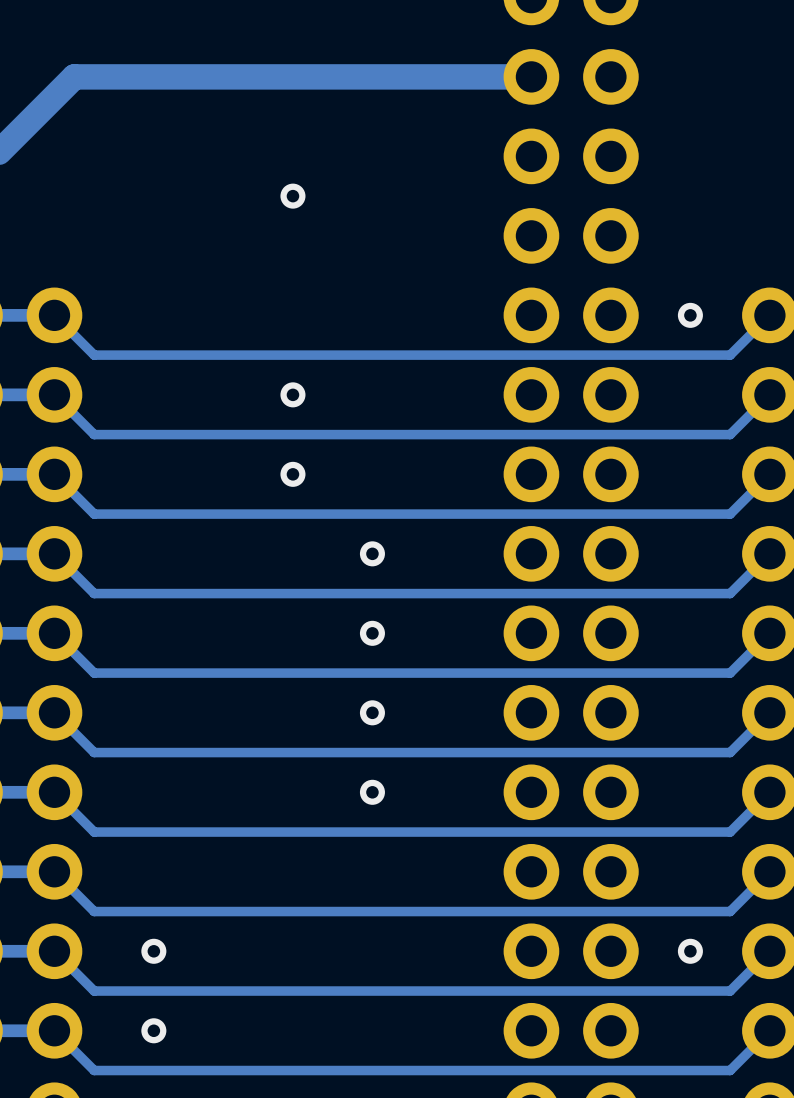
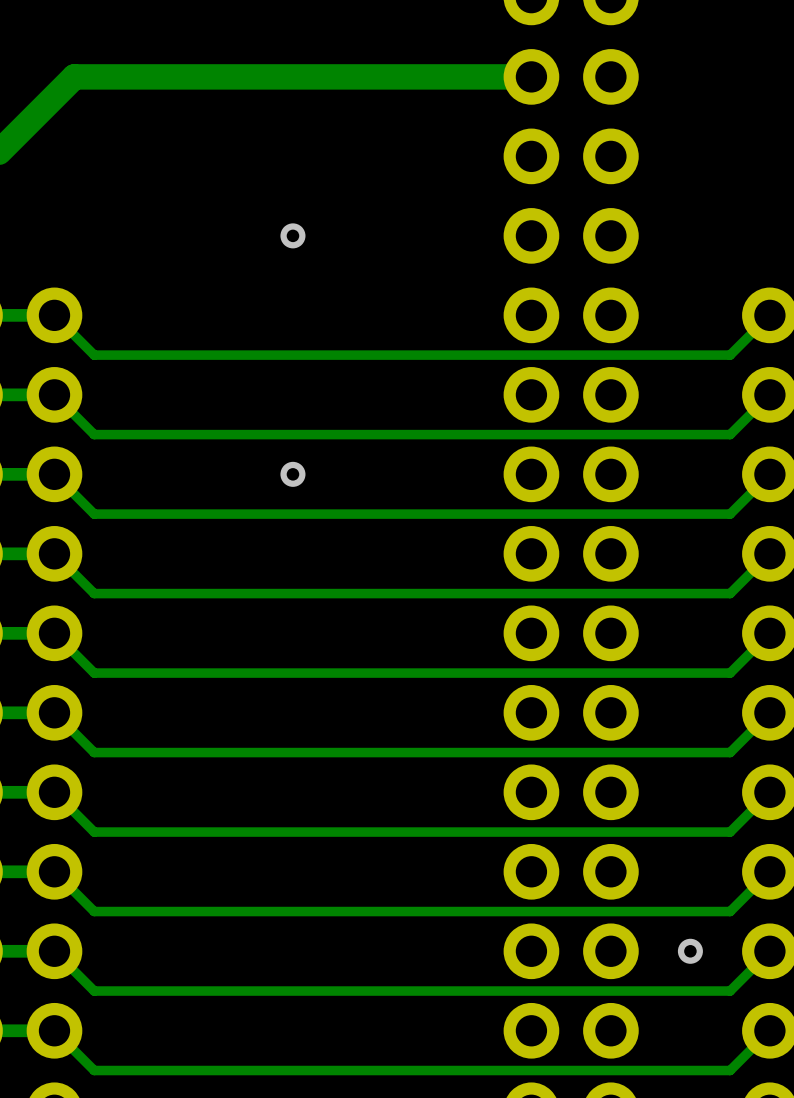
via position: (292, 196) -> (292, 235)
via: (690, 315) -> none
via: (292, 394) -> none
via: (372, 553) -> none
via: (372, 633) -> none
via: (372, 712) -> none
via: (372, 792) -> none
via: (153, 951) -> none
via: (153, 1030) -> none

